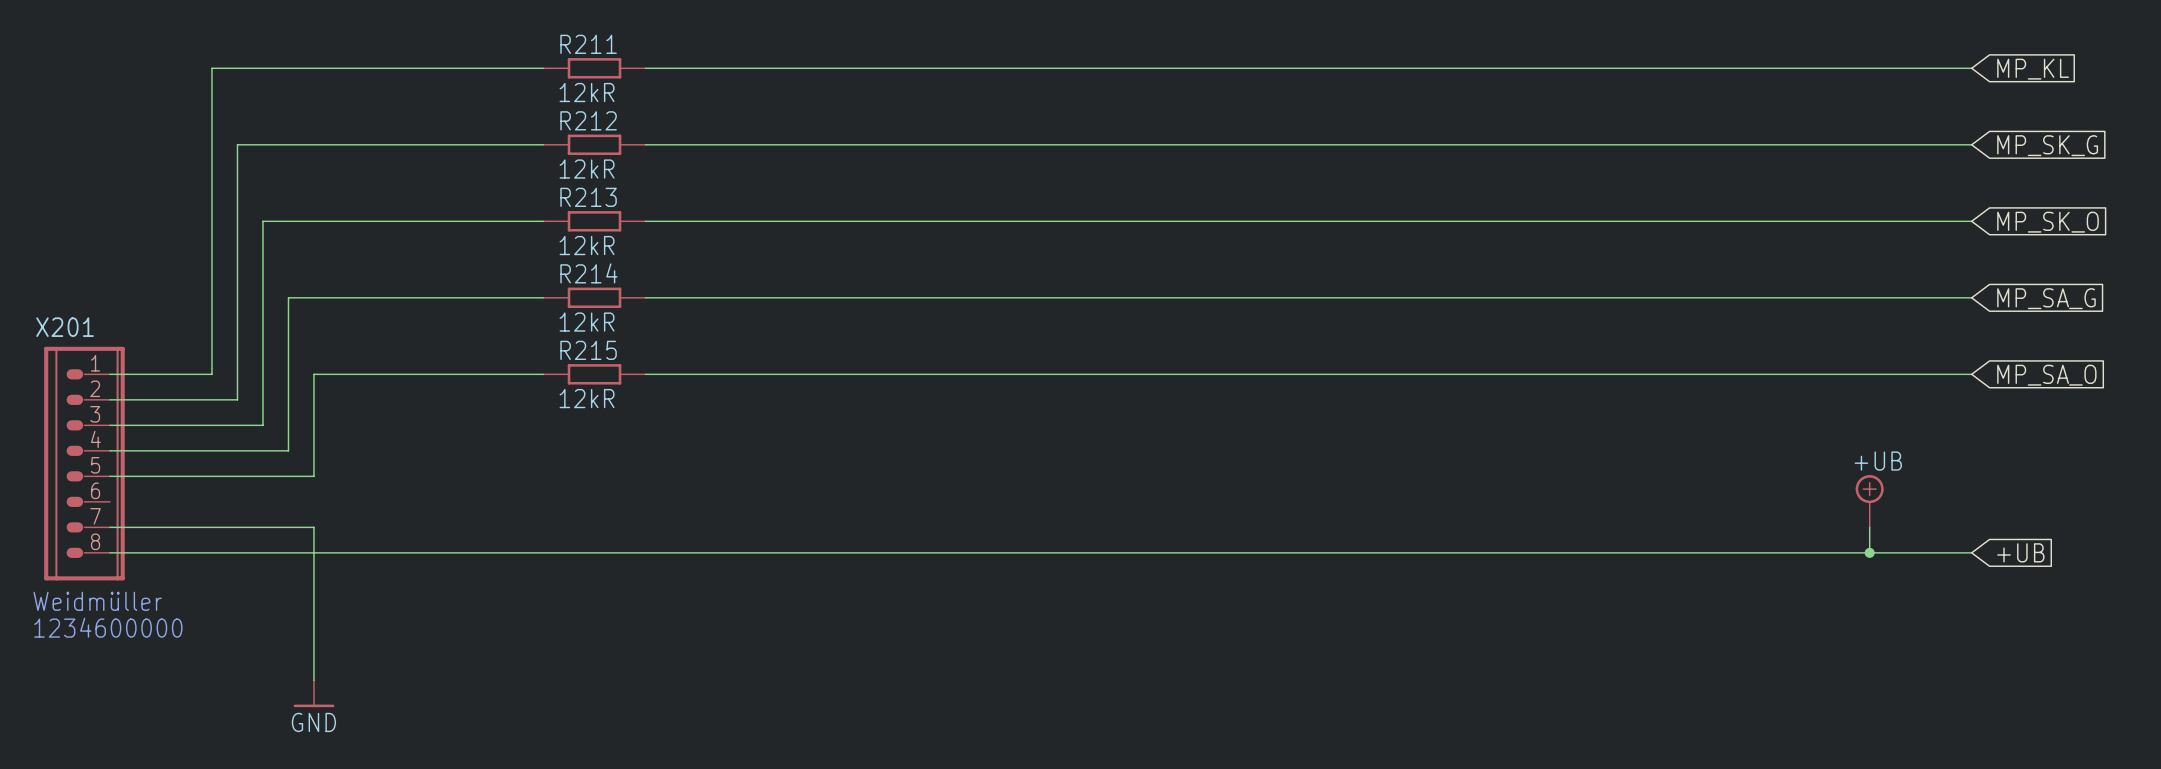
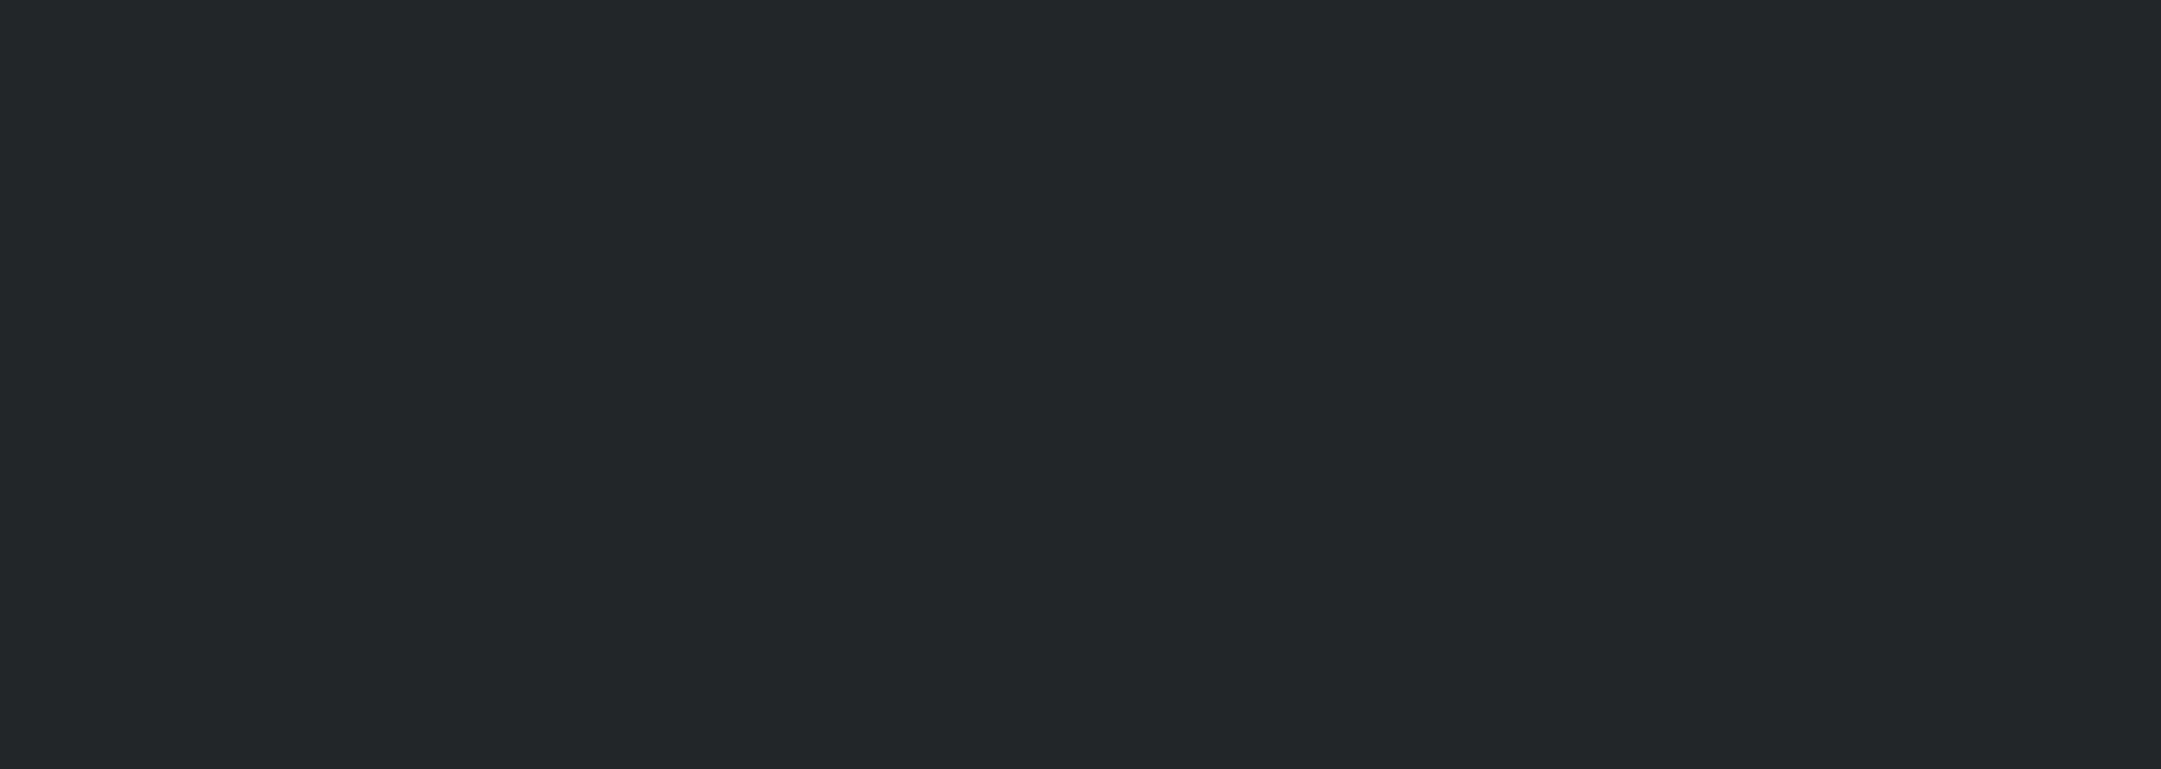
wire: (543, 68) (211, 68) (211, 374) (109, 374) -> none
R211: 12kR (594, 68) -> none
wire: (645, 68) (1971, 68) -> none
global label: MP_KL (2033, 69) -> none
wire: (543, 144) (237, 144) (237, 399) (109, 399) -> none
R212: 12kR (594, 144) -> none
wire: (645, 144) (1971, 144) -> none
global label: MP_SK_G (2047, 145) -> none
wire: (543, 221) (262, 221) (262, 425) (109, 425) -> none
R213: 12kR (594, 221) -> none
wire: (645, 221) (1971, 221) -> none
global label: MP_SK_O (2048, 222) -> none
wire: (543, 297) (288, 297) (288, 450) (109, 450) -> none
R214: 12kR (594, 297) -> none
wire: (645, 297) (1971, 297) -> none
global label: MP_SA_G (2046, 298) -> none
wire: (543, 374) (313, 374) (313, 476) (109, 476) -> none
R215: 12kR (594, 374) -> none
wire: (645, 374) (1971, 374) -> none
global label: MP_SA_O (2046, 375) -> none
X201: (84, 463) -> none
power symbol: +UB (1869, 501) -> none
wire: (109, 527) (313, 527) (313, 680) -> none
wire: (1869, 527) (1869, 552) -> none
wire: (109, 552) (1971, 552) -> none
junction: (1869, 552) -> none
global label: +UB (2020, 552) -> none
text: Weidmüller (97, 601) -> none
text: 1234600000 (108, 627) -> none
power symbol: GND (313, 693) -> none

